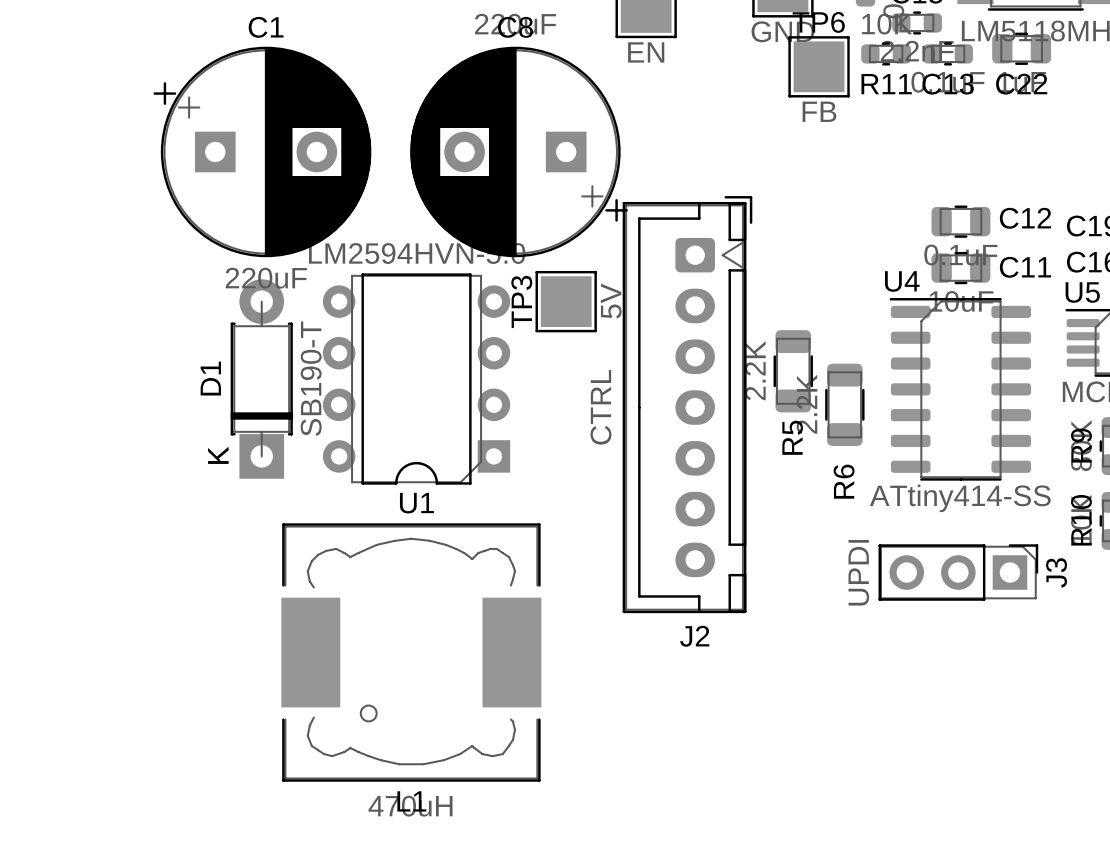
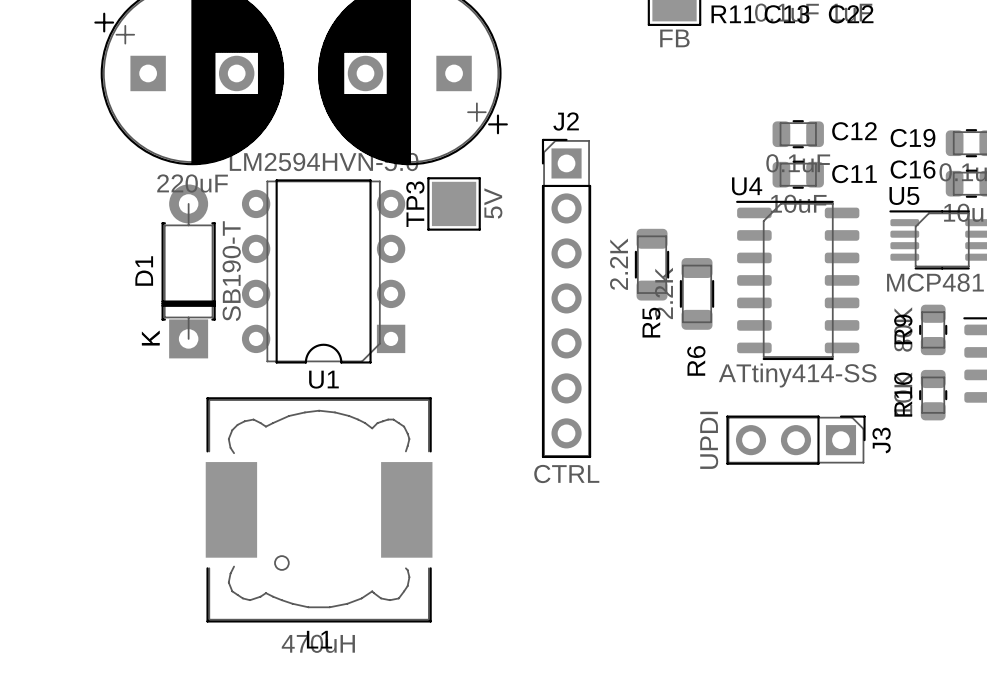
J2 footprint: [622, 196, 753, 614] -> [541, 138, 592, 459]
J2 value position: CTRL (600, 407) -> CTRL (566, 473)
J2 name position: J2 (694, 636) -> J2 (566, 121)

